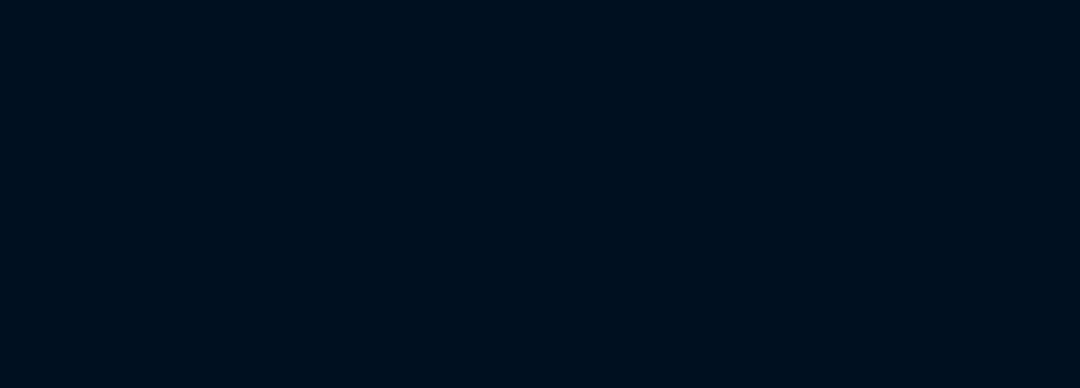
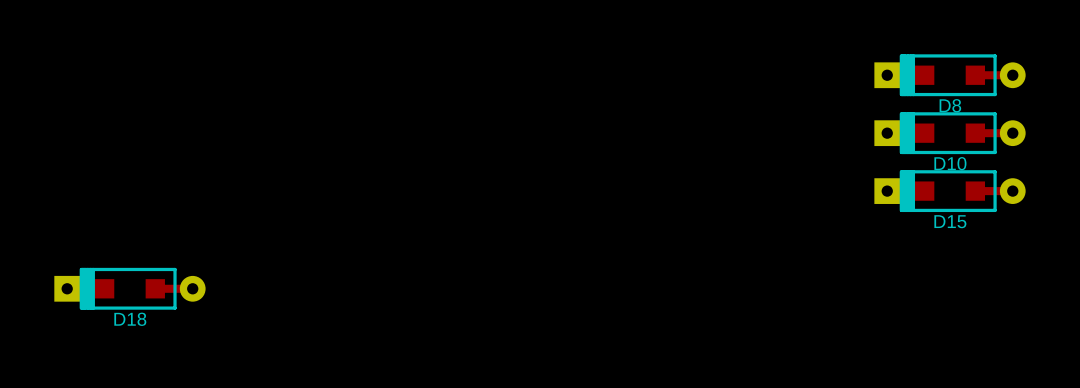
D8: none -> (950, 75)
D10: none -> (950, 133)
D15: none -> (950, 191)
D18: none -> (129, 288)

